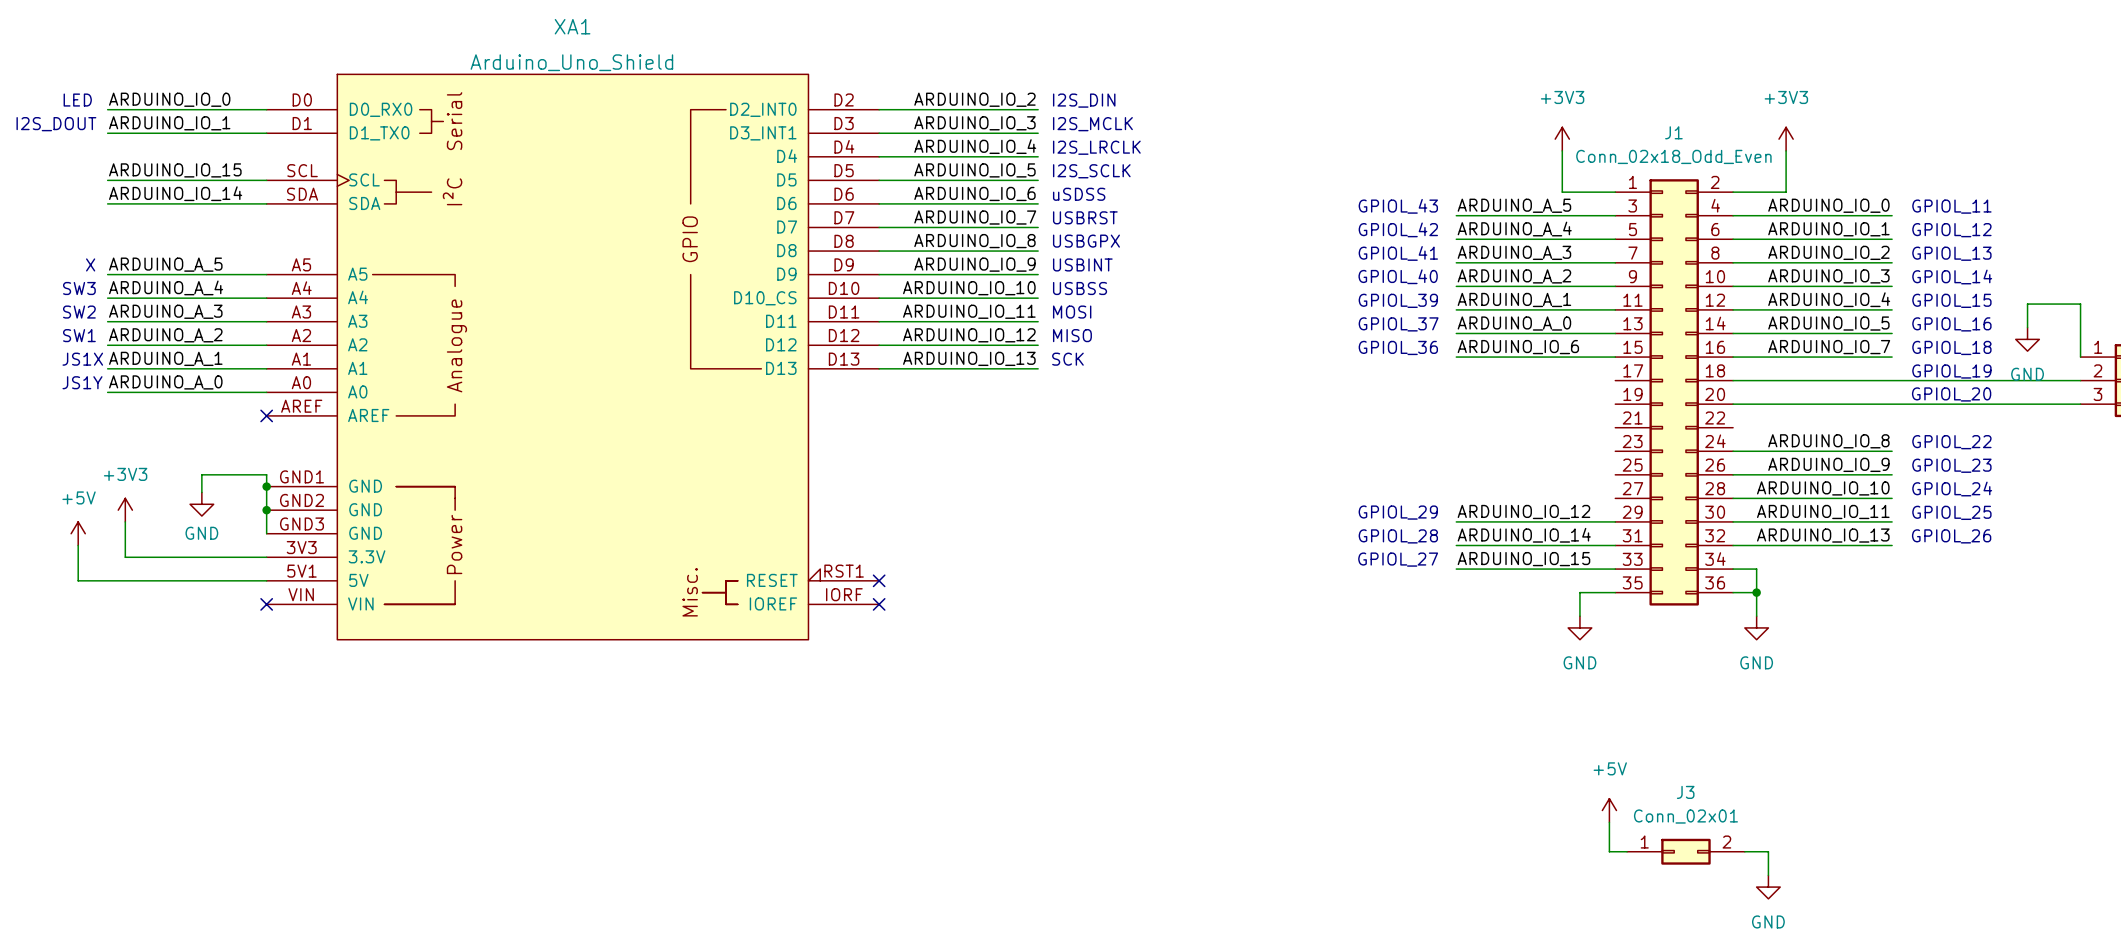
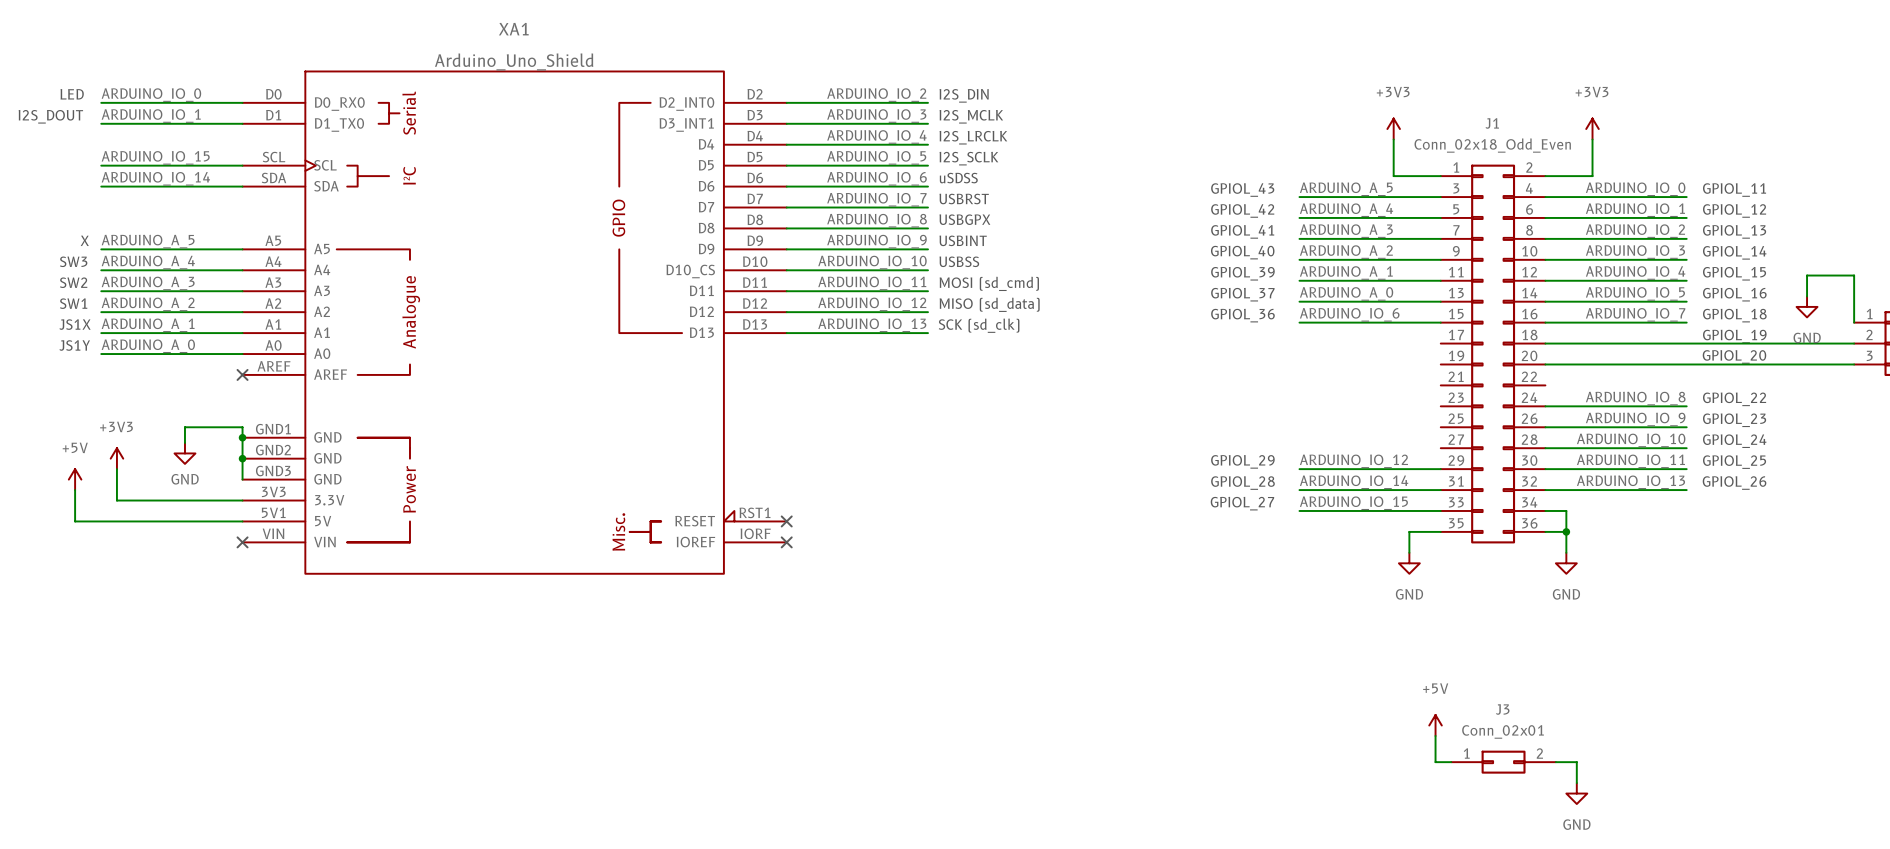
text: MOSI (1072, 312) -> MOSI (sd_cmd) (989, 283)
text: MISO (1072, 335) -> MISO (sd_data) (989, 304)
text: SCK (1067, 359) -> SCK (sd_clk) (979, 325)

